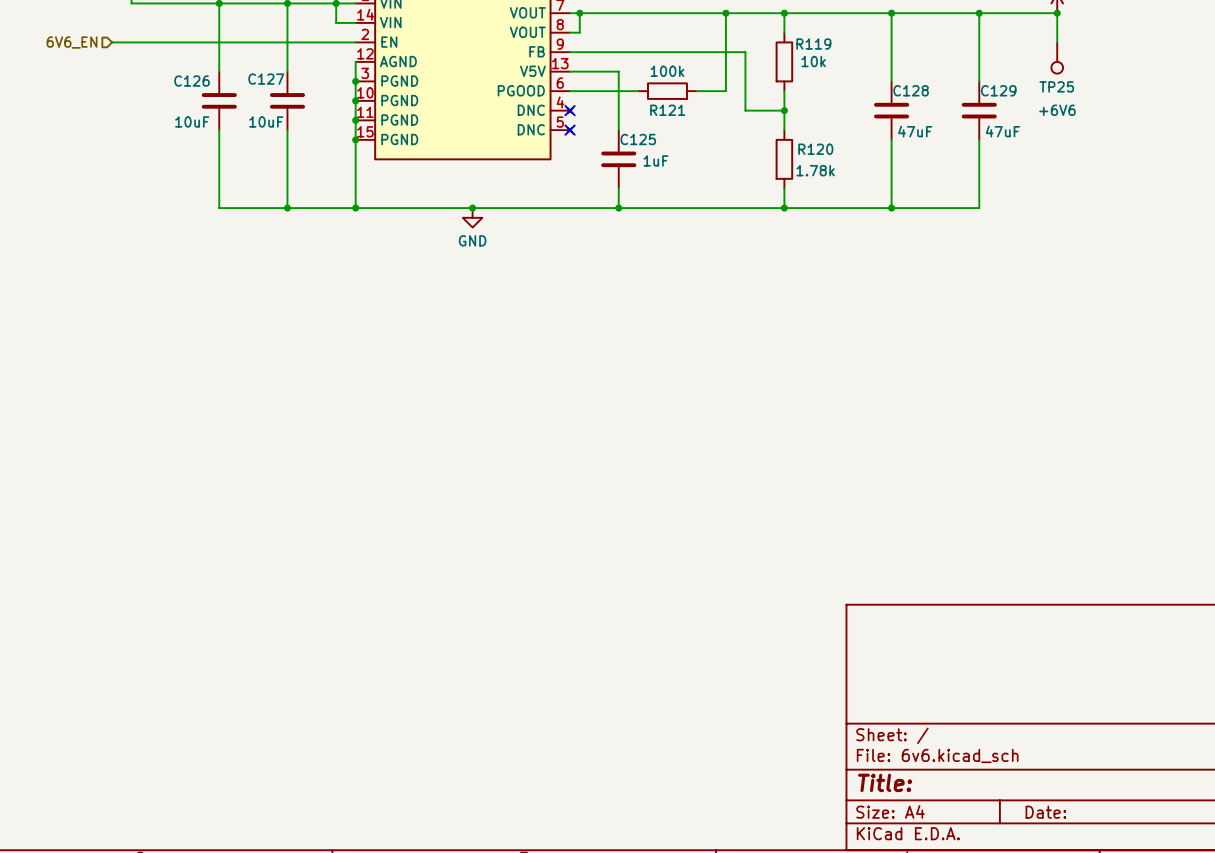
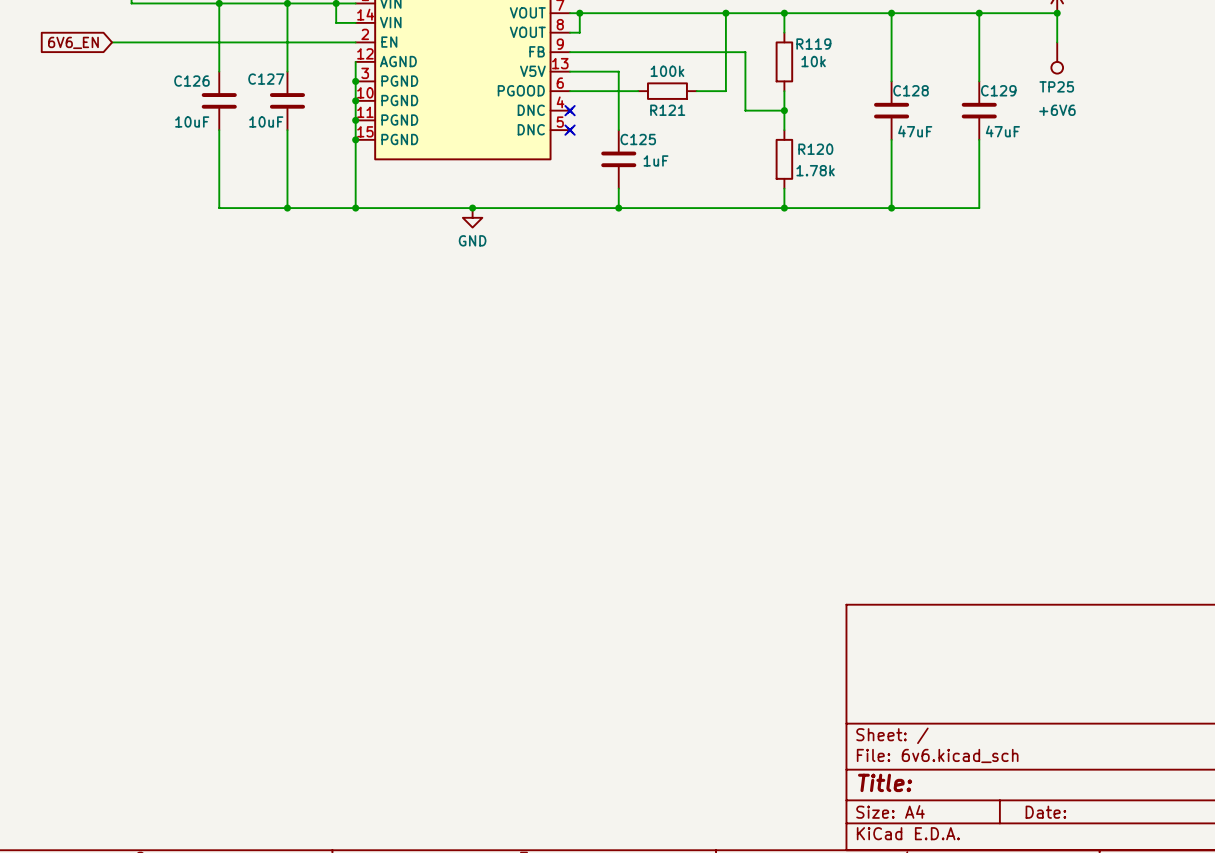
hierarchical label: 6V6_EN (72, 42) -> none
global label: none -> 6V6_EN (73, 42)

